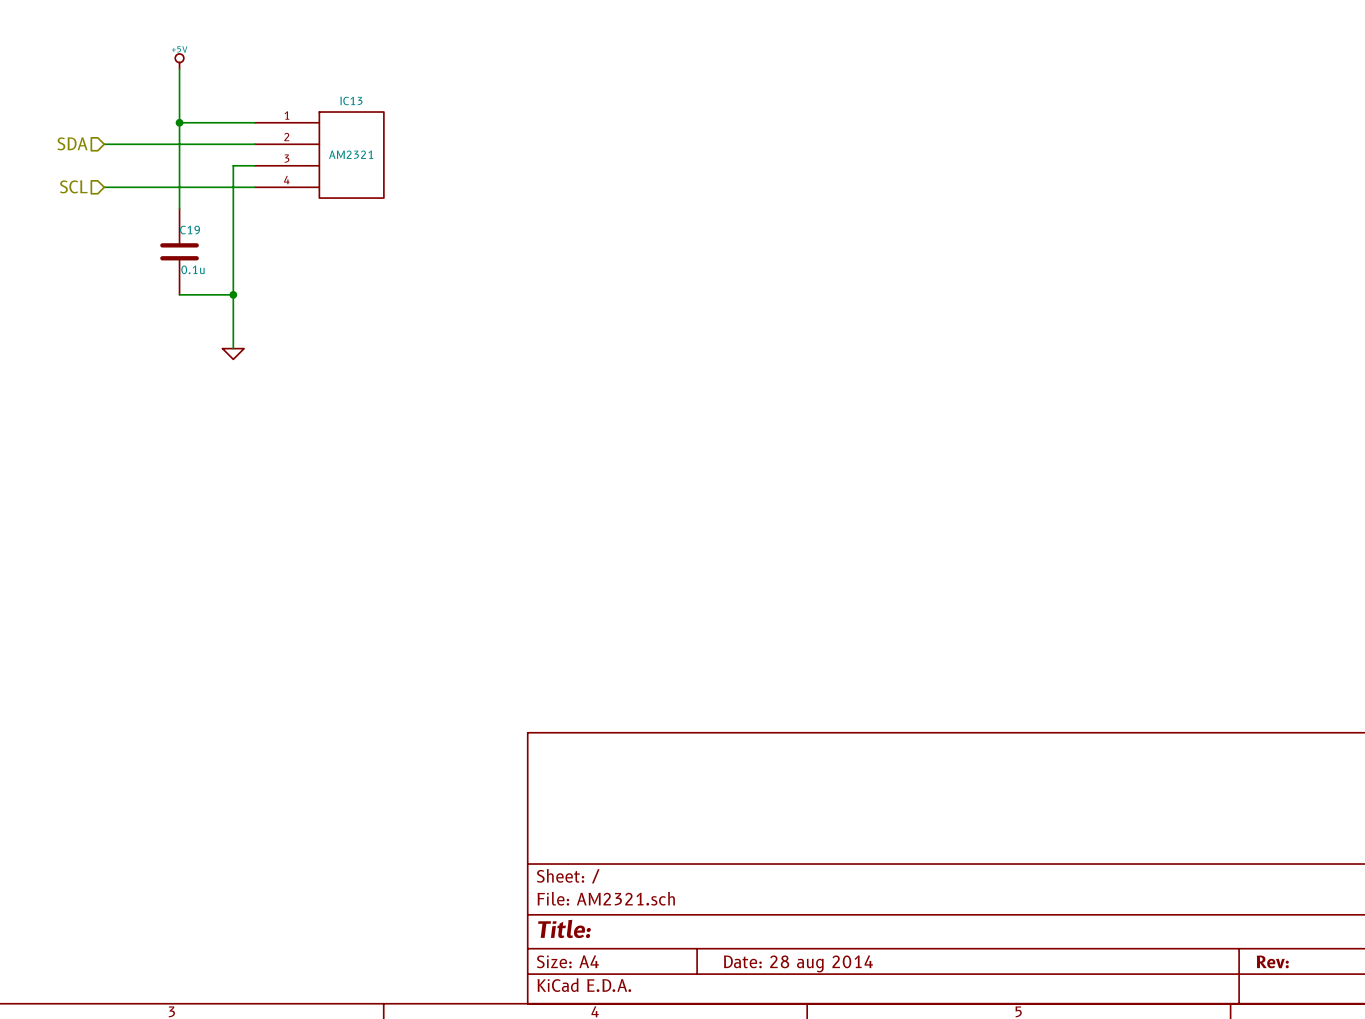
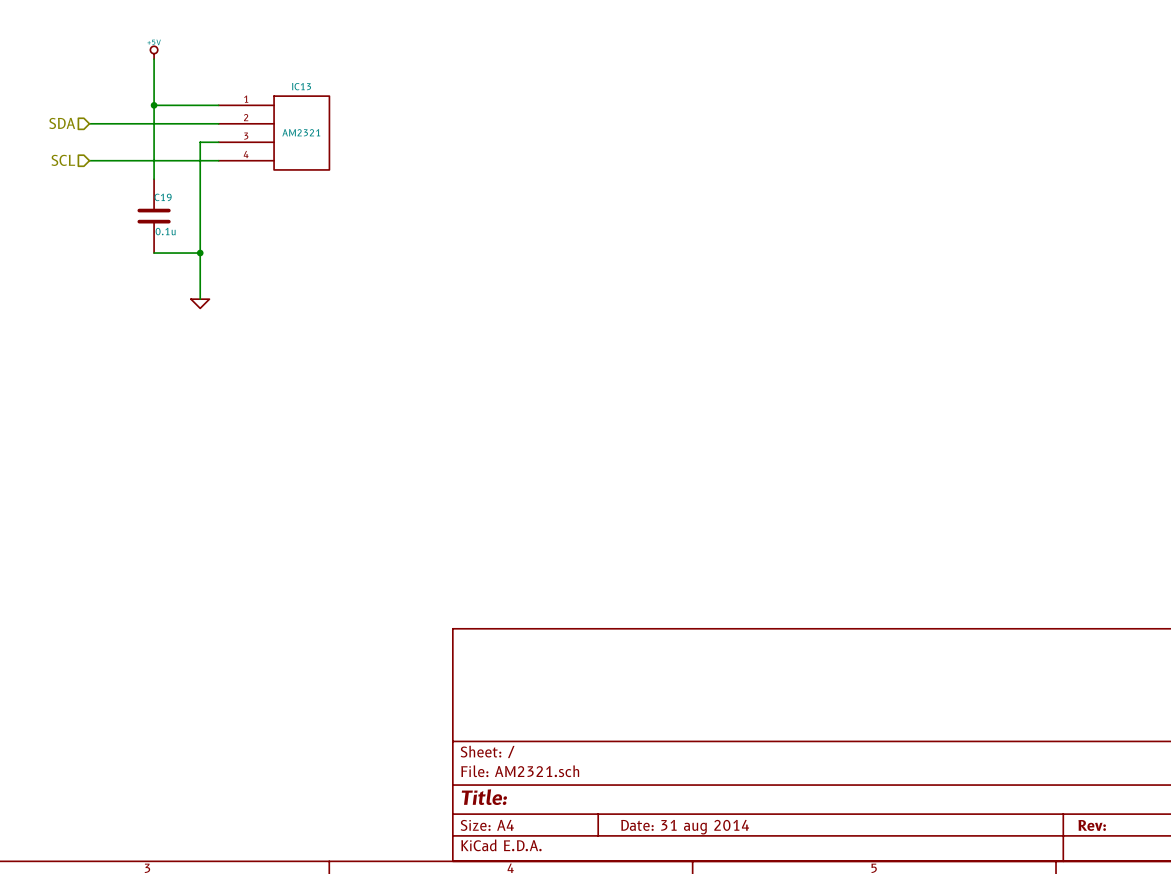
title block: Date: 28 aug 2014 (798, 963) -> Date: 31 aug 2014 (685, 827)

